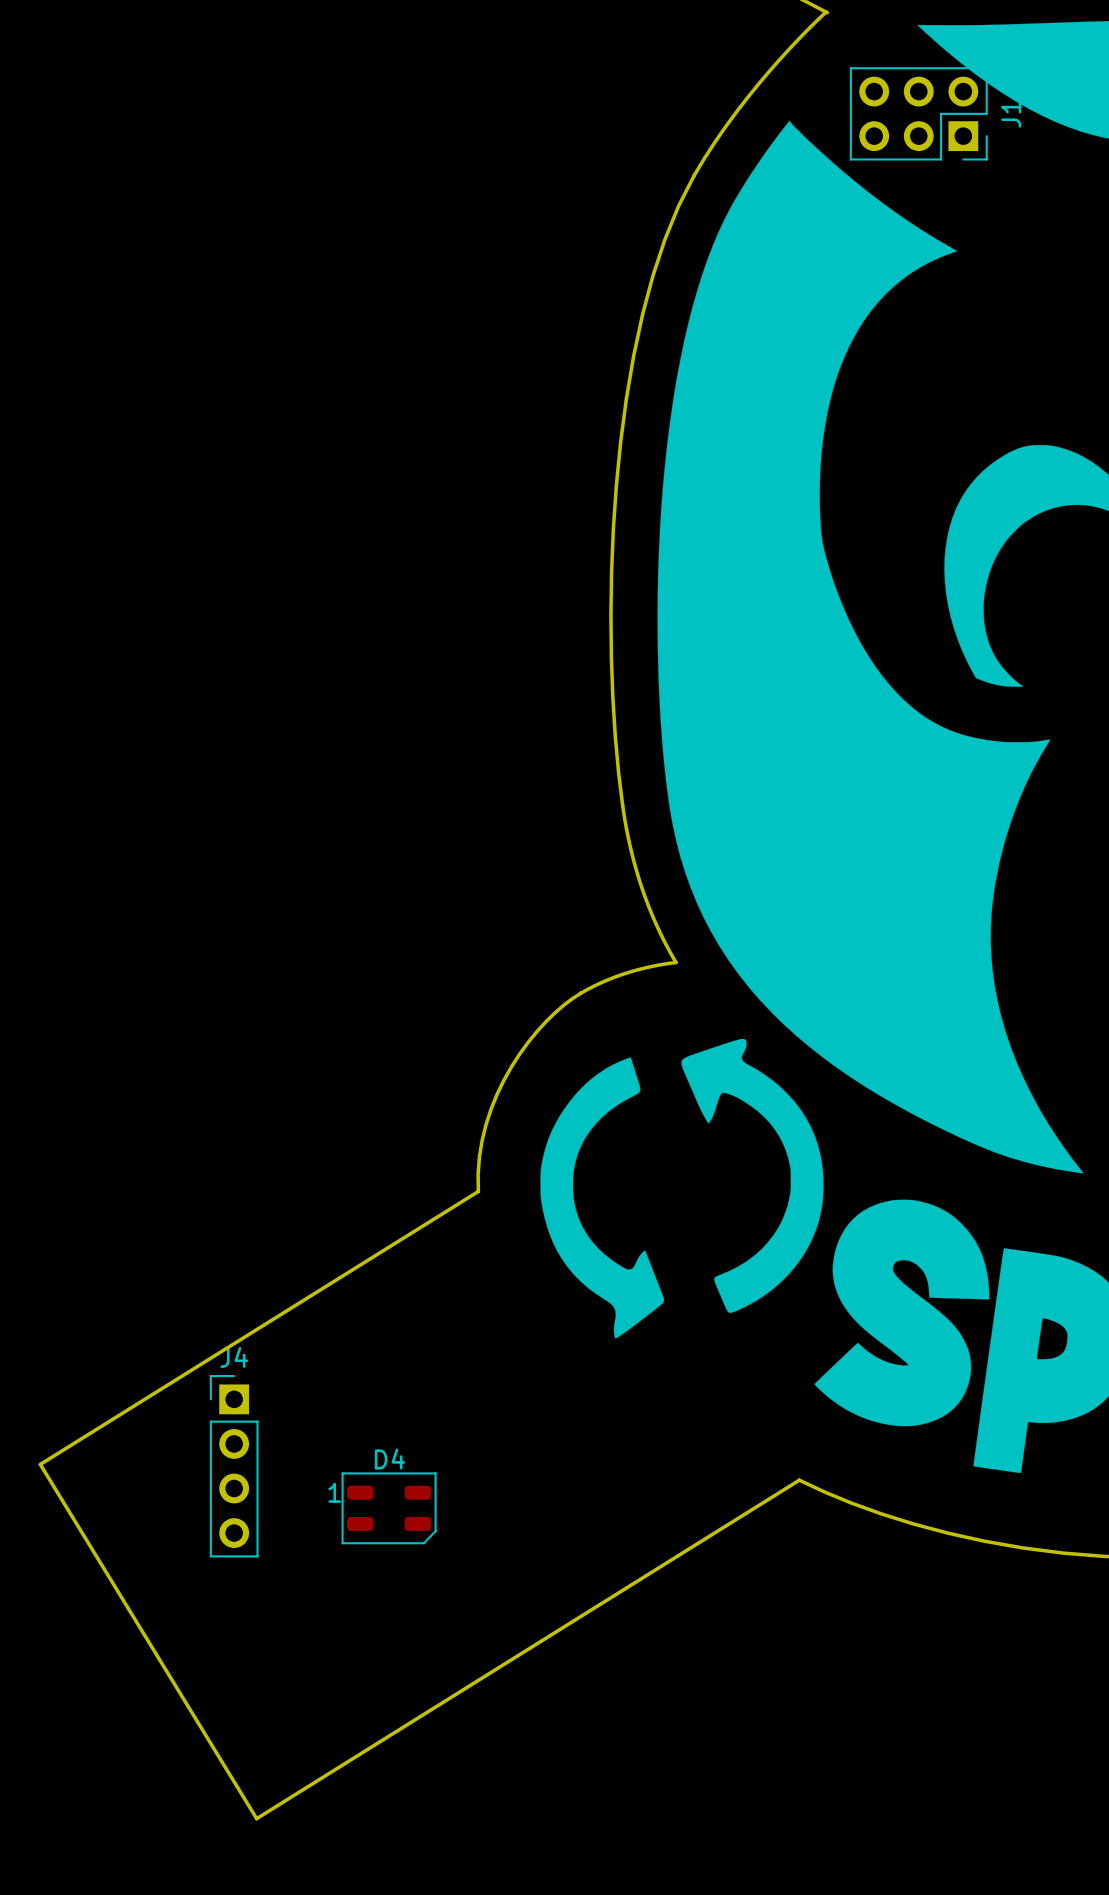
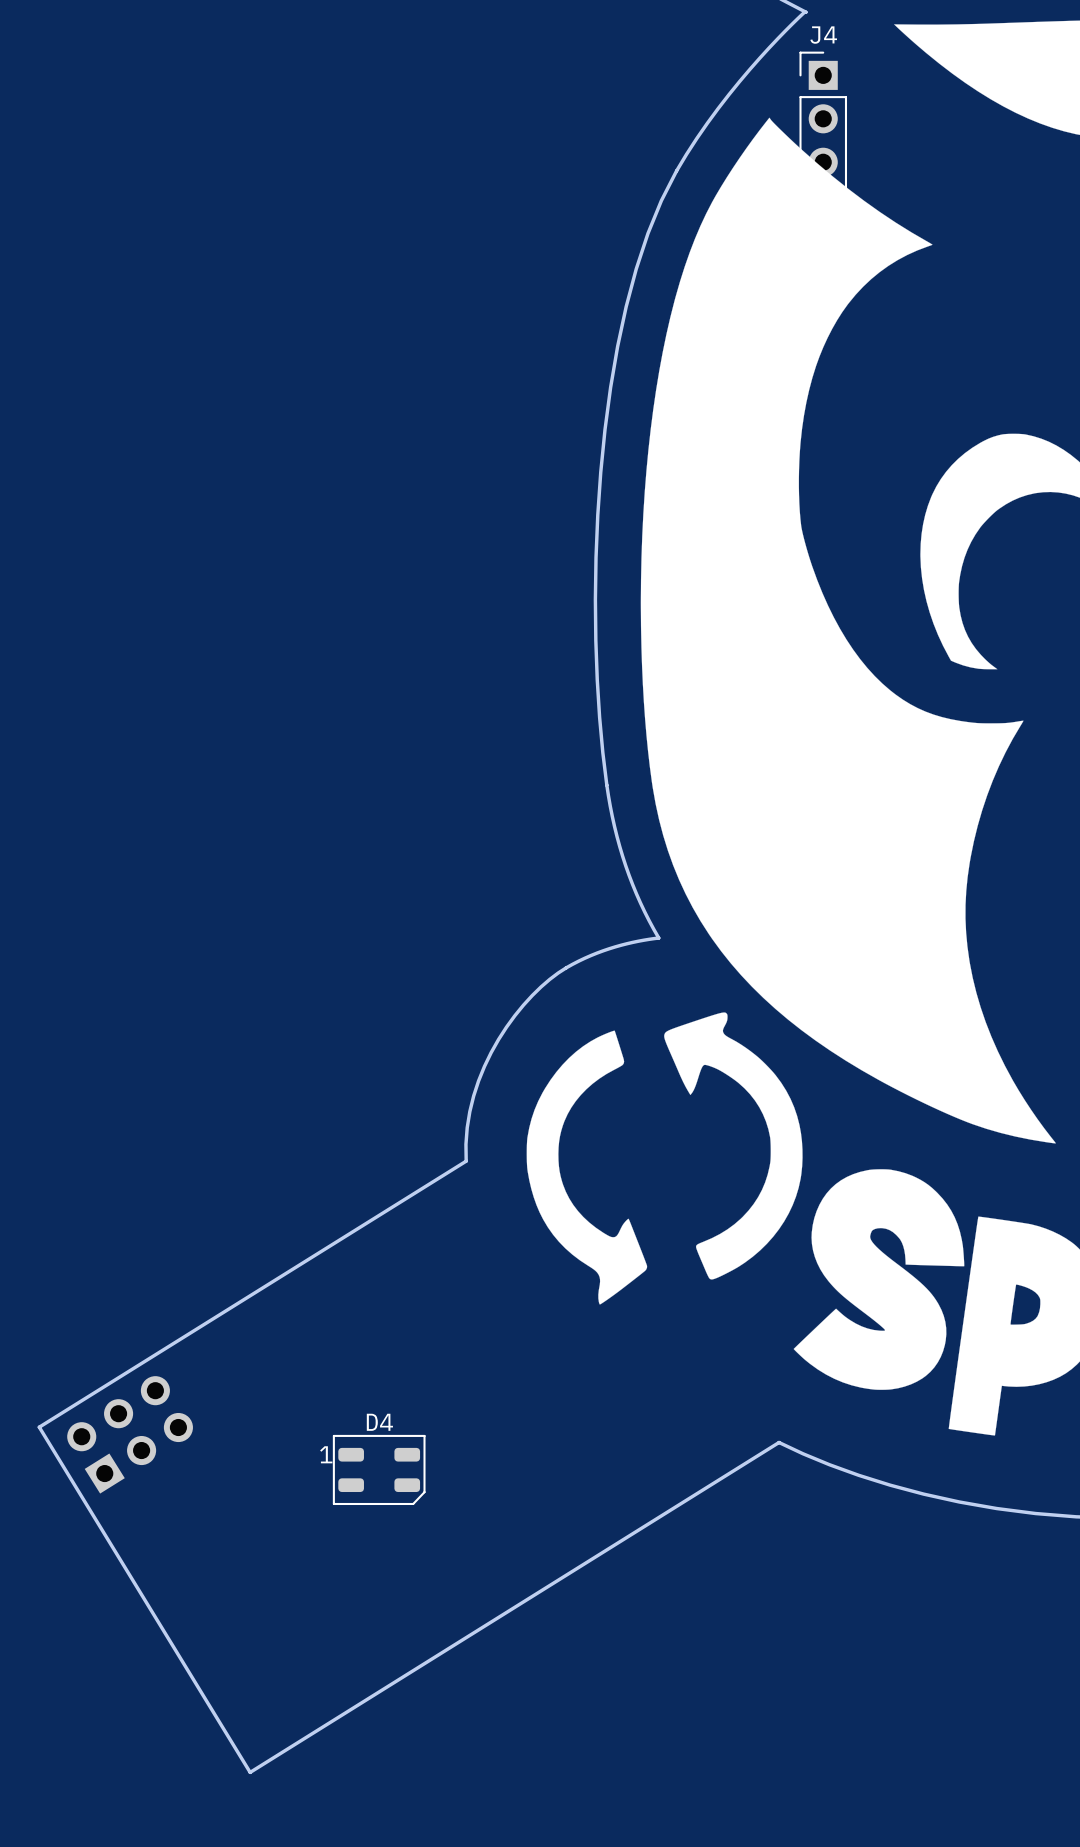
J1: (918, 113) -> none
J4 position: (234, 1466) -> (823, 140)
part: none -> (130, 1434)

